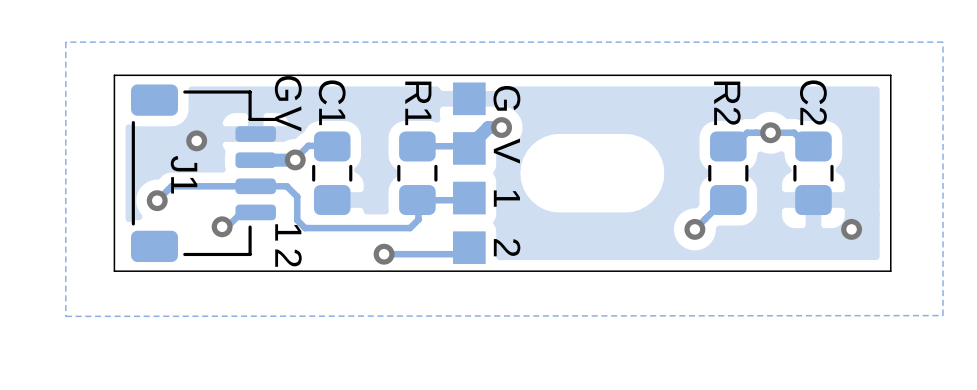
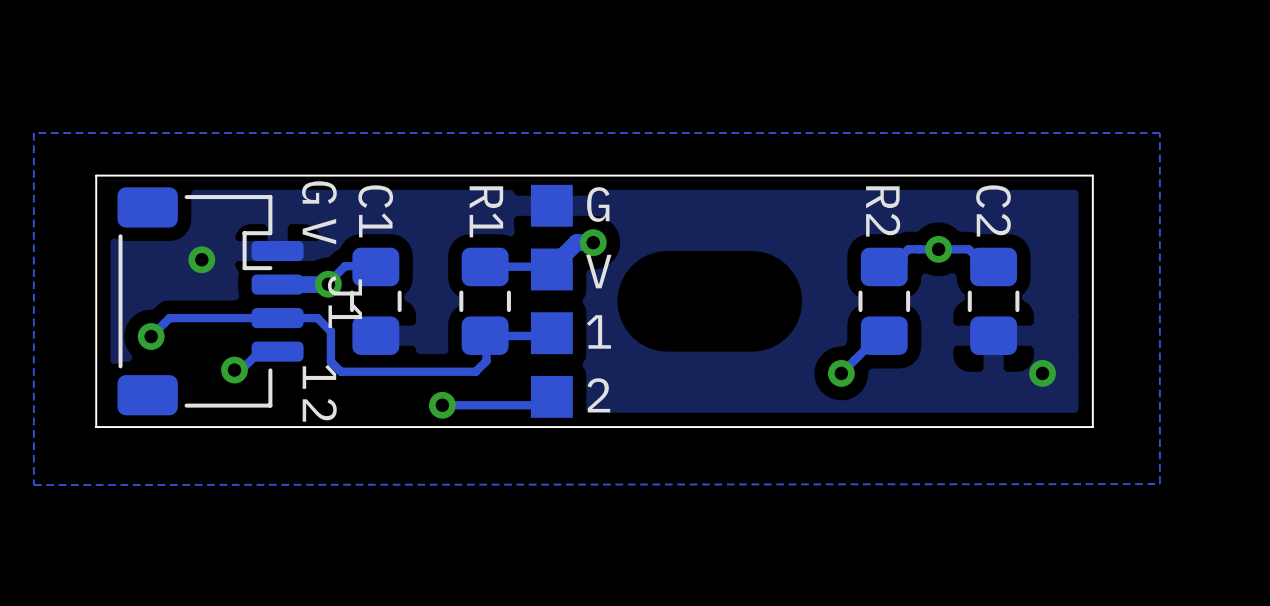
J1 footprint: [130, 84, 278, 263] -> [117, 187, 304, 416]
text rotation: 0° (506, 98) -> 90° counterclockwise (598, 204)
text rotation: 0° (506, 151) -> 90° counterclockwise (598, 271)
J1 name position: J1 (184, 174) -> J1 (344, 301)
text rotation: 0° (506, 198) -> 90° counterclockwise (598, 331)
text rotation: 0° (507, 247) -> 90° counterclockwise (598, 395)

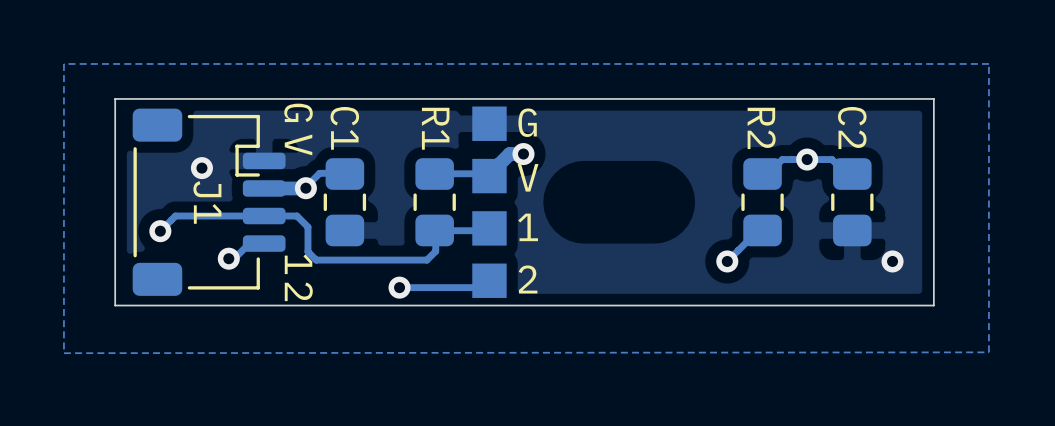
J1 name position: J1 (344, 301) -> J1 (207, 202)

